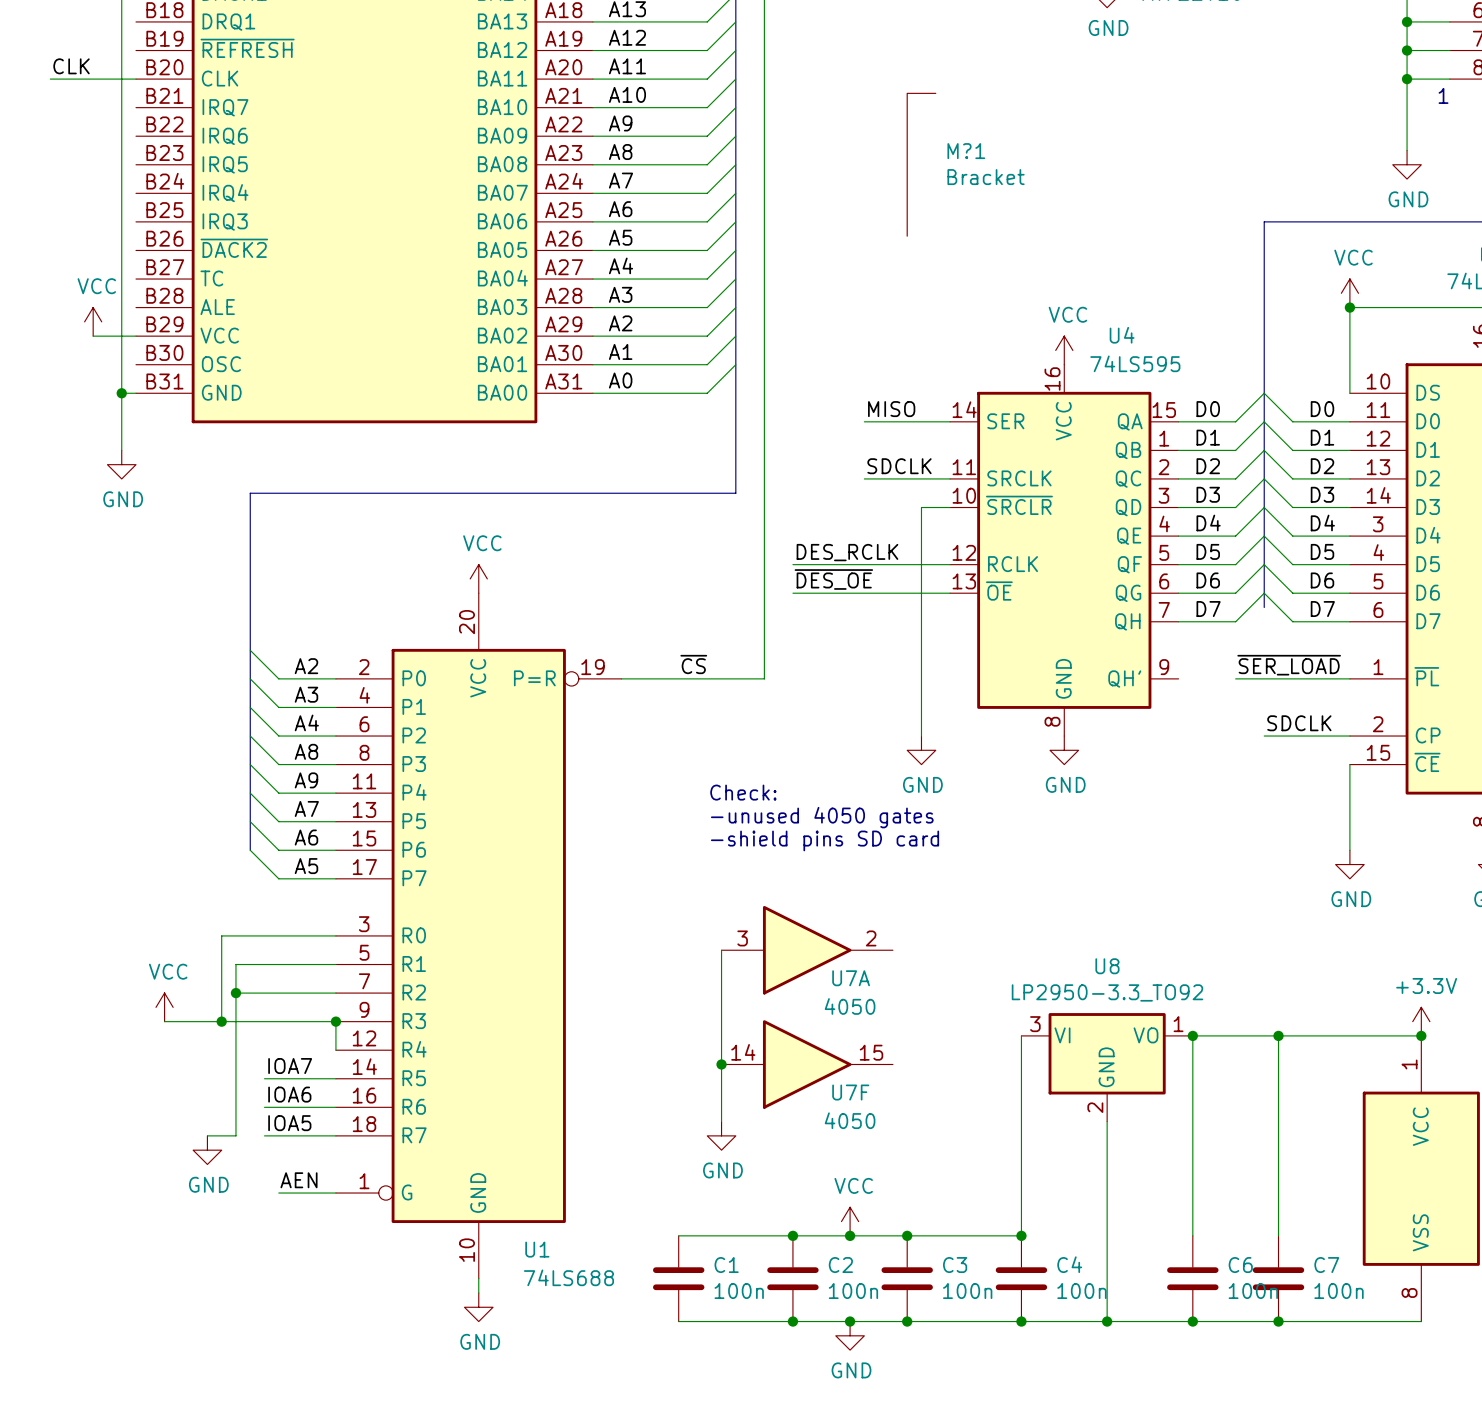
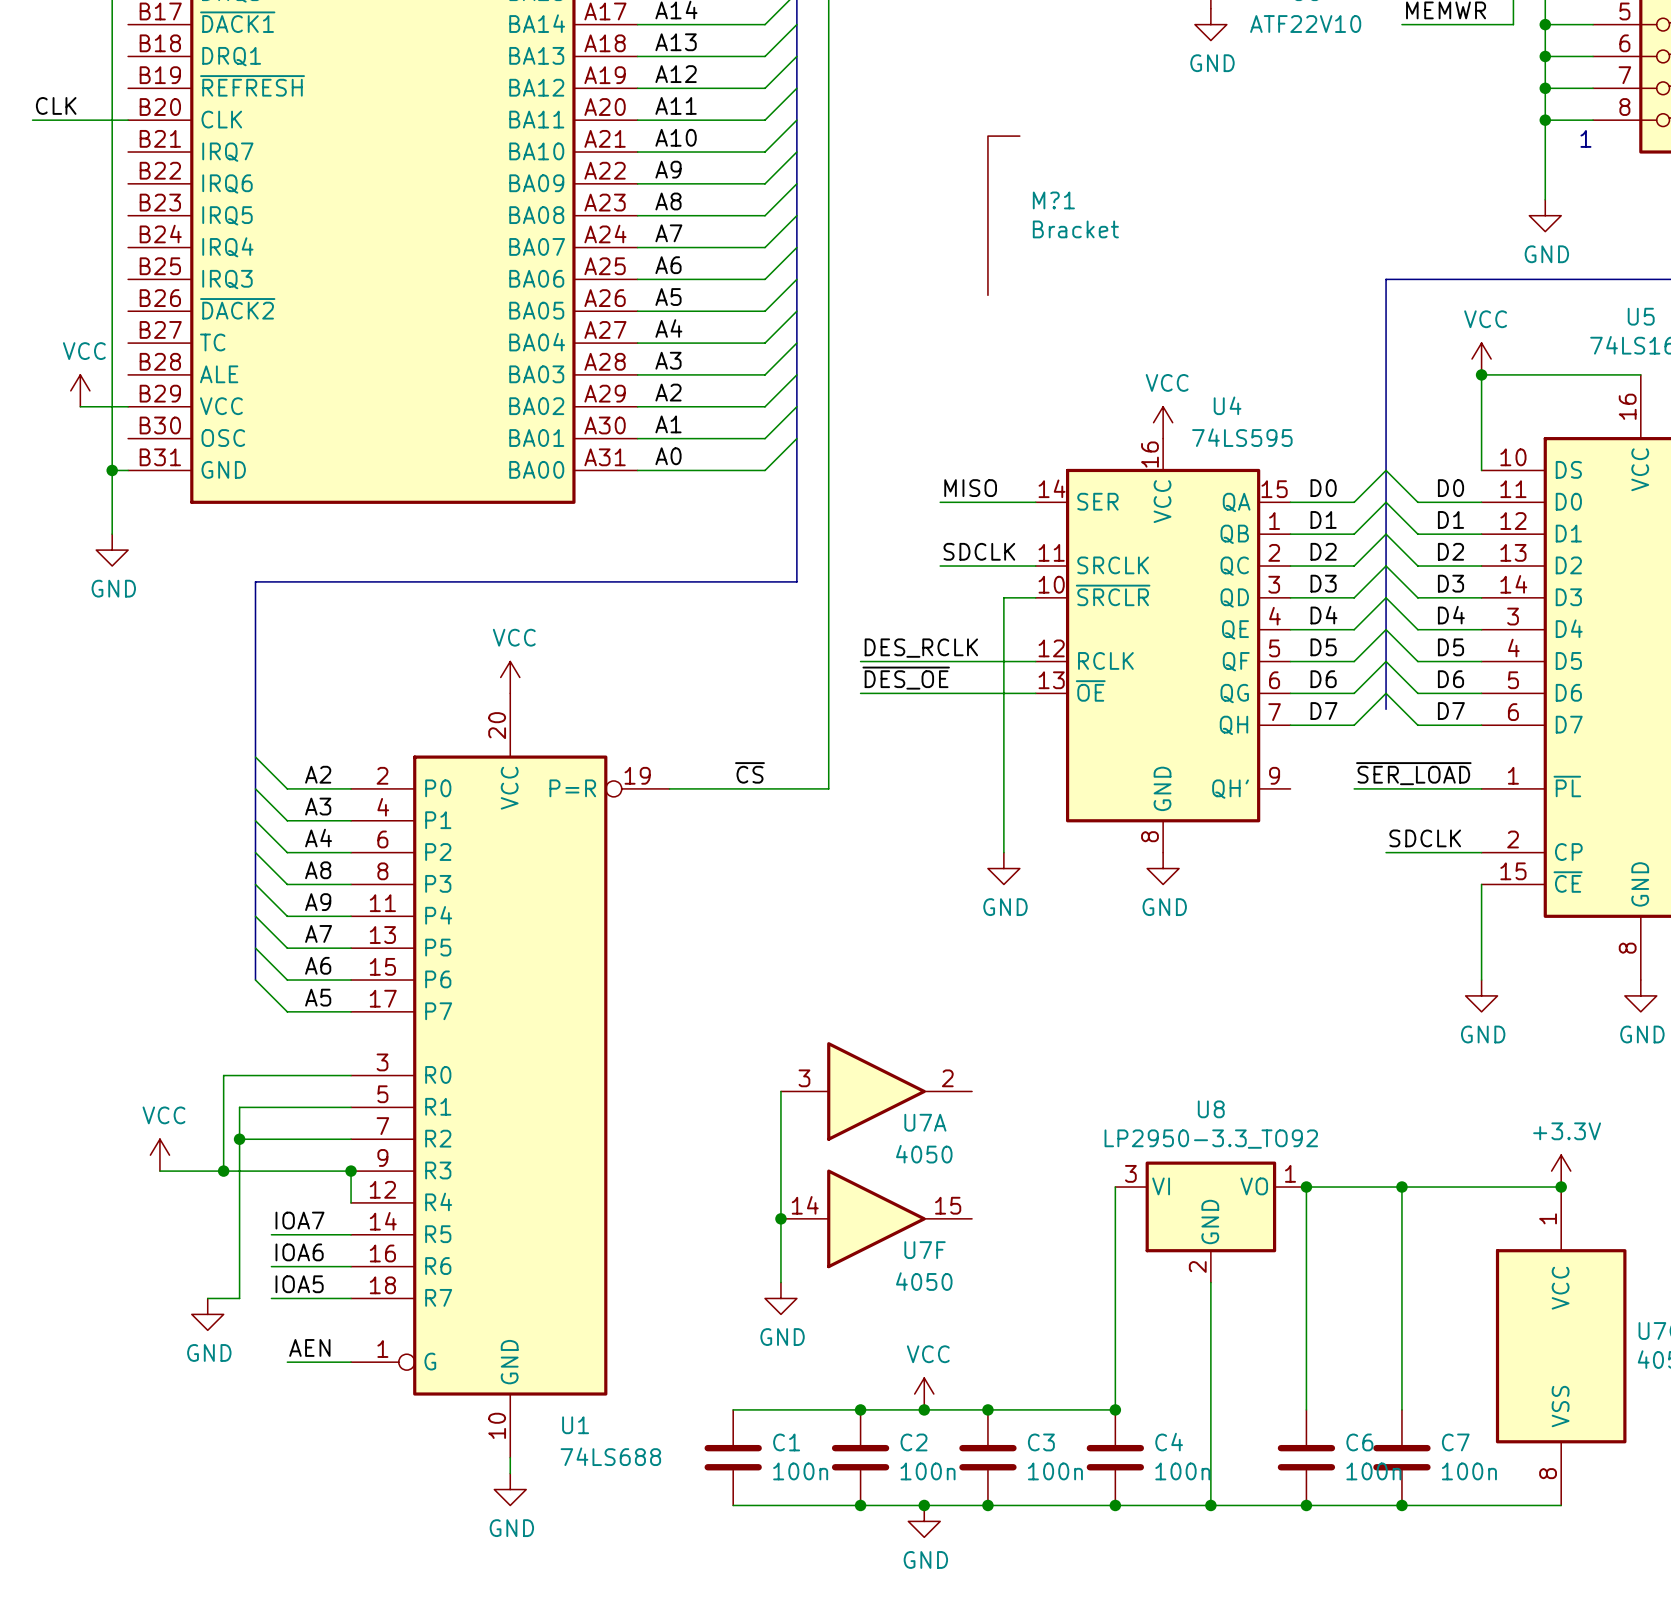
text: Check: (743, 792) -> none
text: -unused 4050 gates (822, 817) -> none
text: -shield pins SD card (825, 840) -> none

